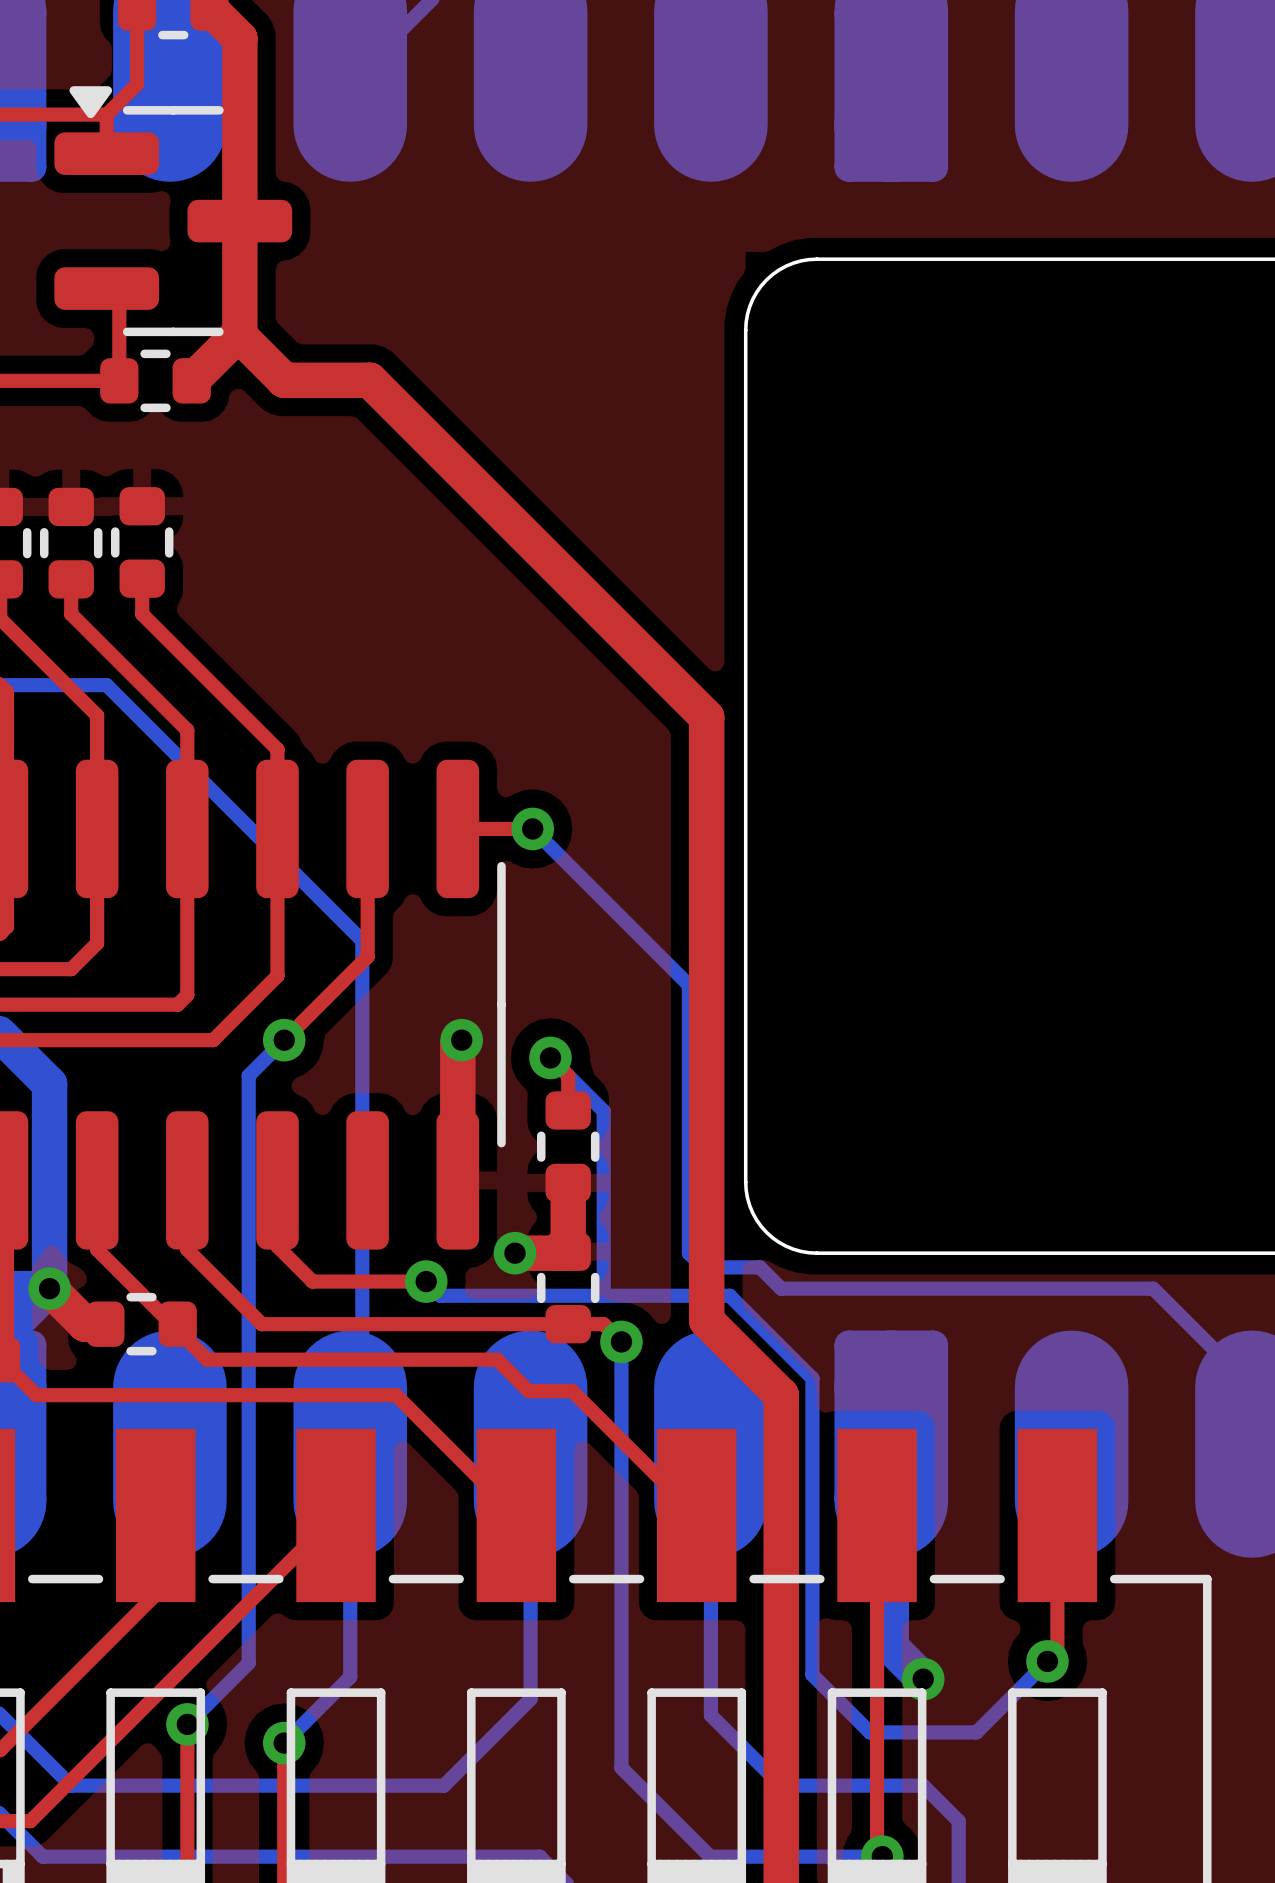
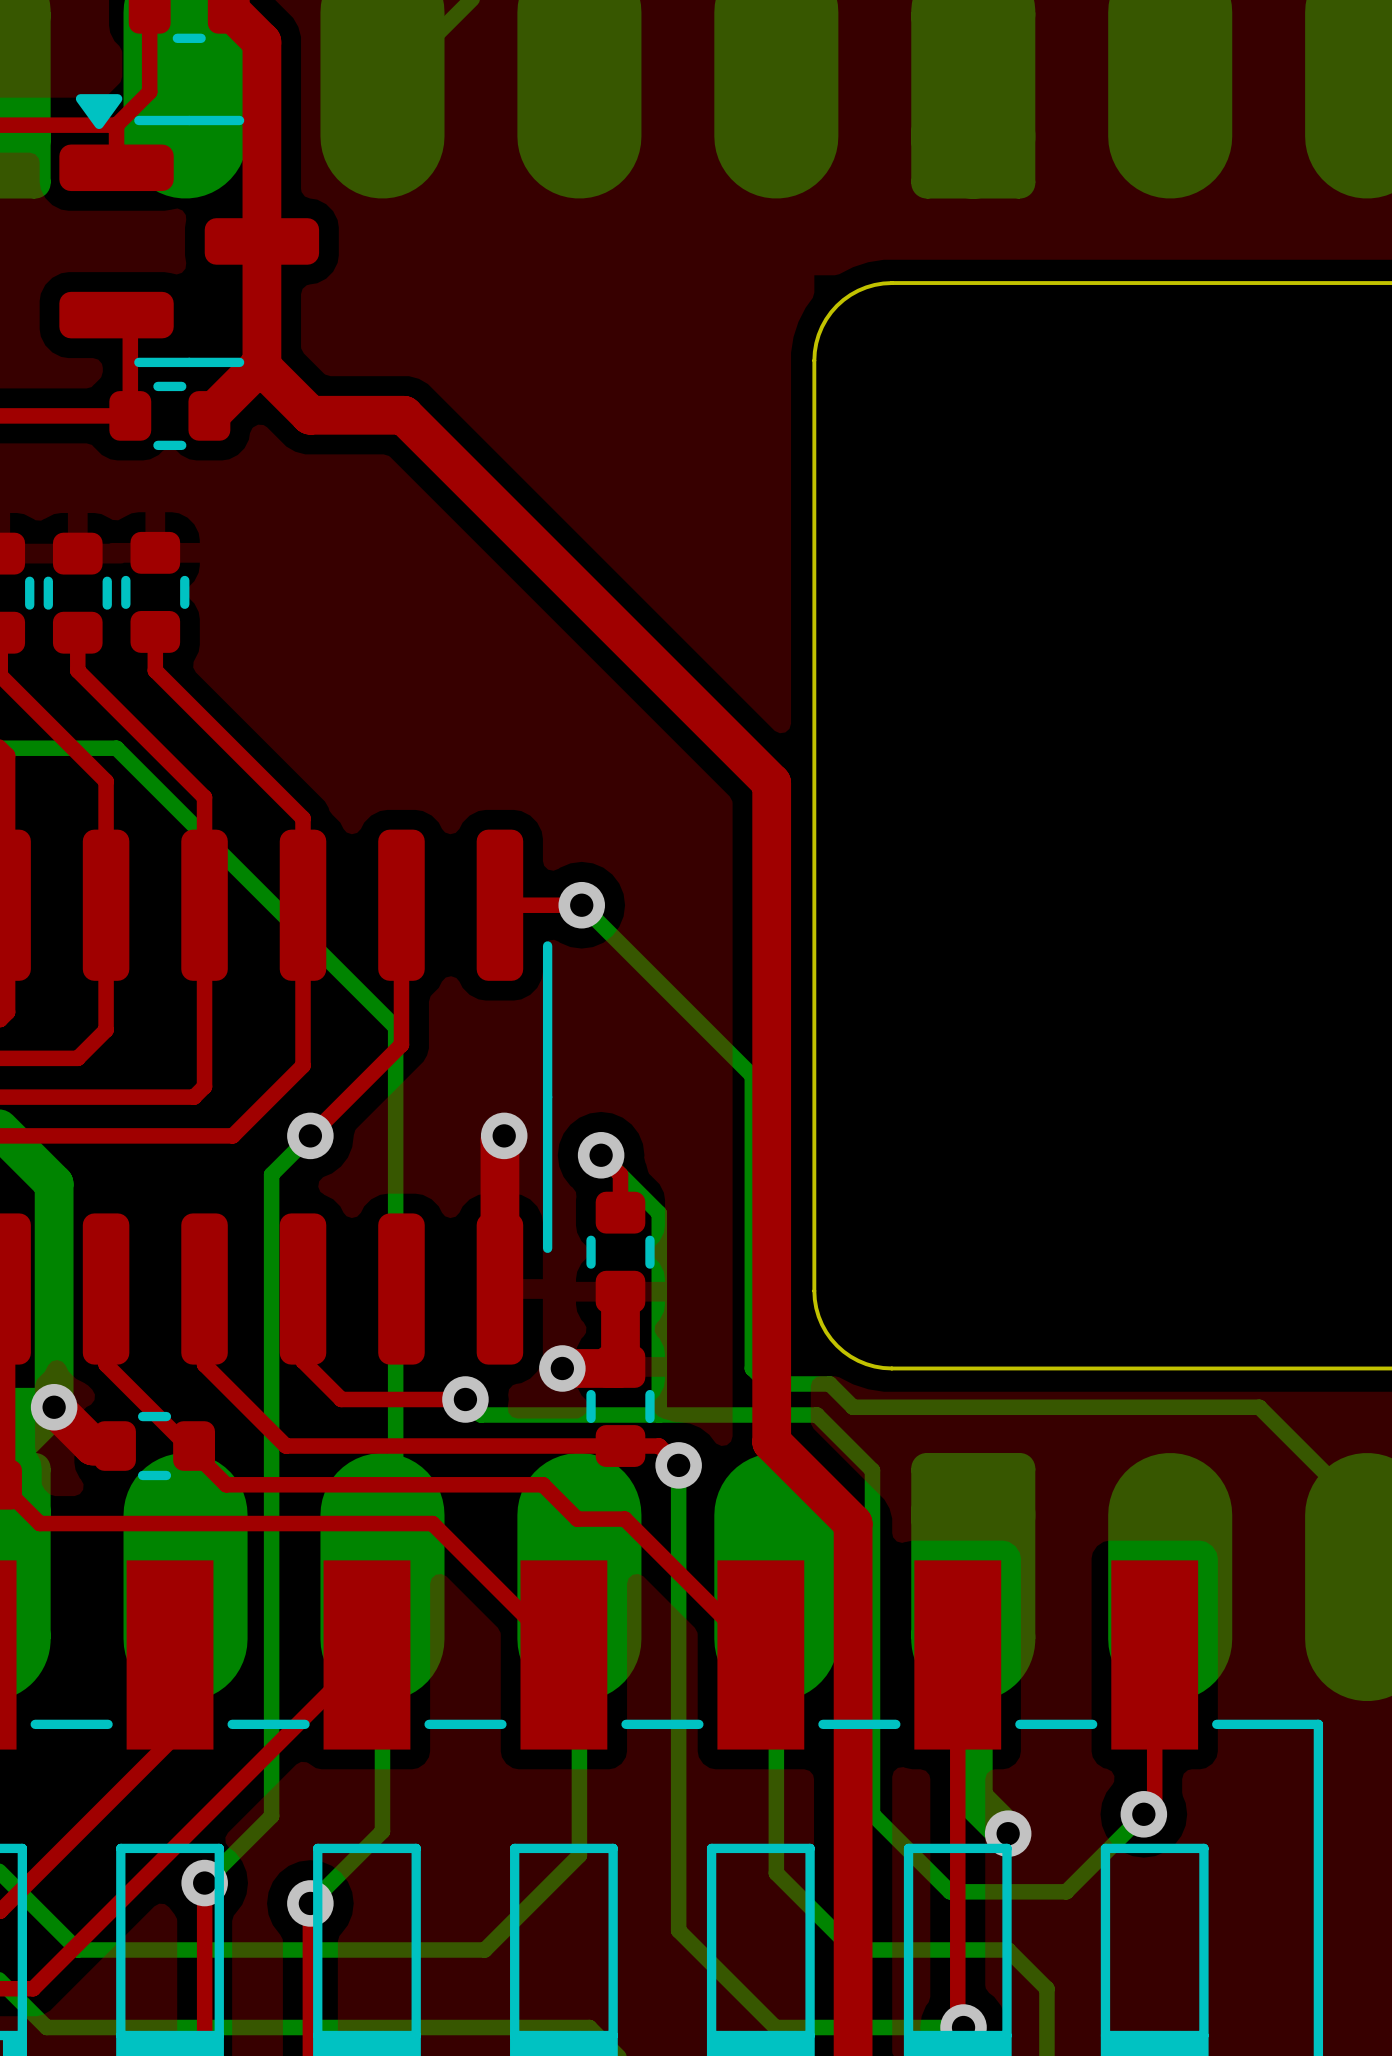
bottom track: (729, 1295) (812, 1378) (812, 1674) -> (796, 1415) (816, 1415) (872, 1470) (872, 1814) (887, 1829)

